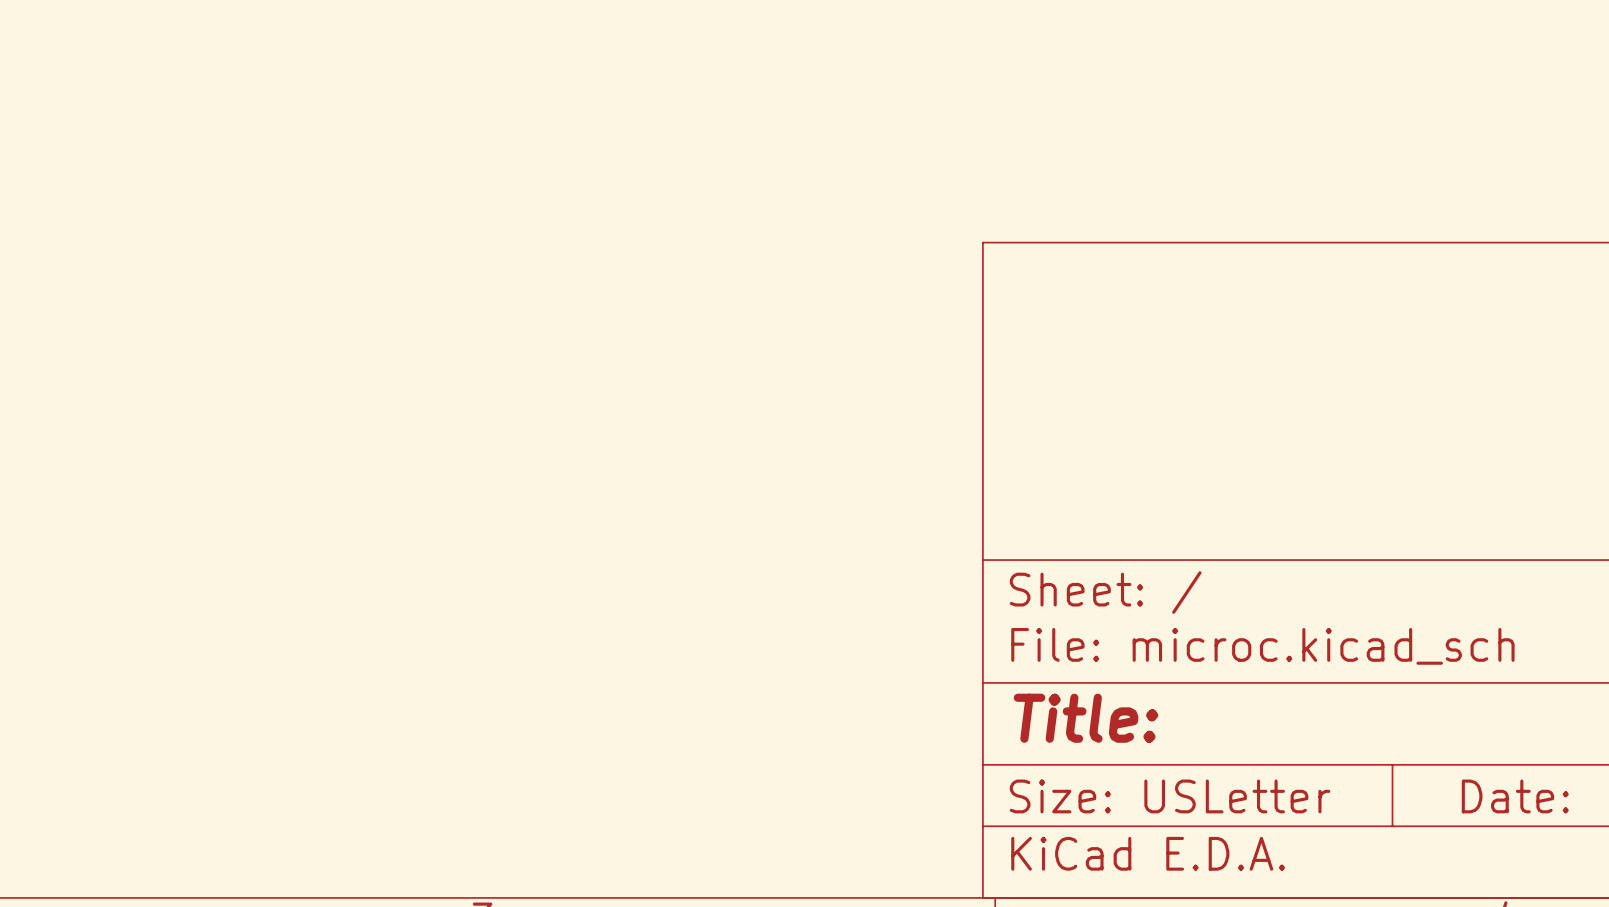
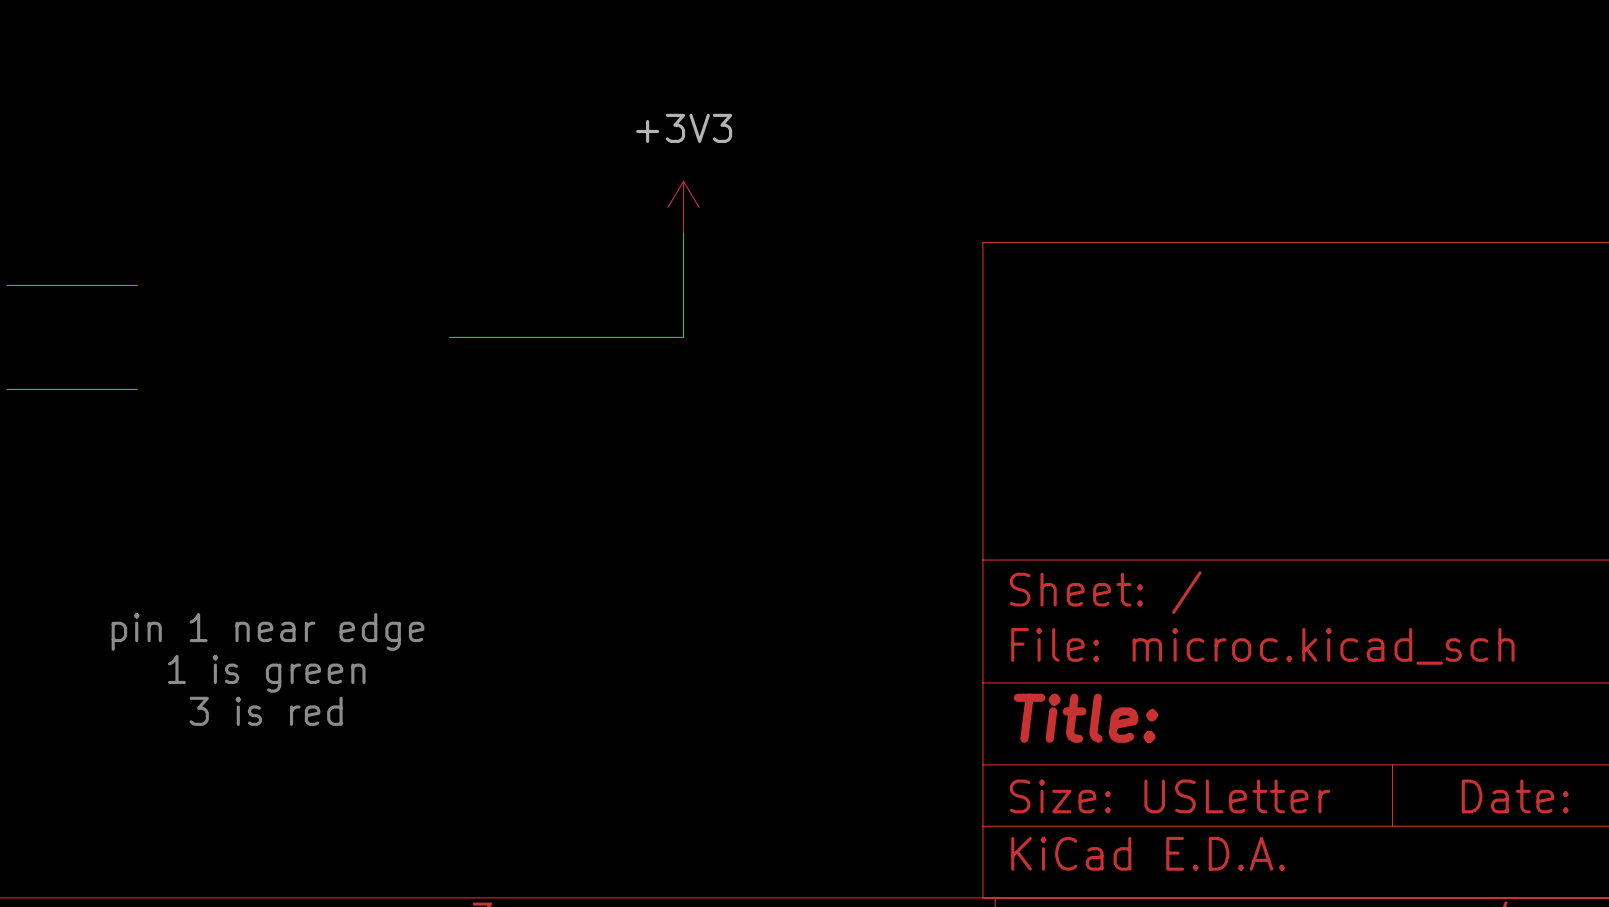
power symbol: none -> +3V3 (683, 207)
wire: none -> (683, 233) (683, 337) (449, 337)
wire: none -> (7, 285) (137, 285)
wire: none -> (7, 389) (137, 389)
text: none -> pin 1 near edge (268, 631)
text: none -> 1 is green (266, 673)
text: none -> 3 is red (266, 711)

